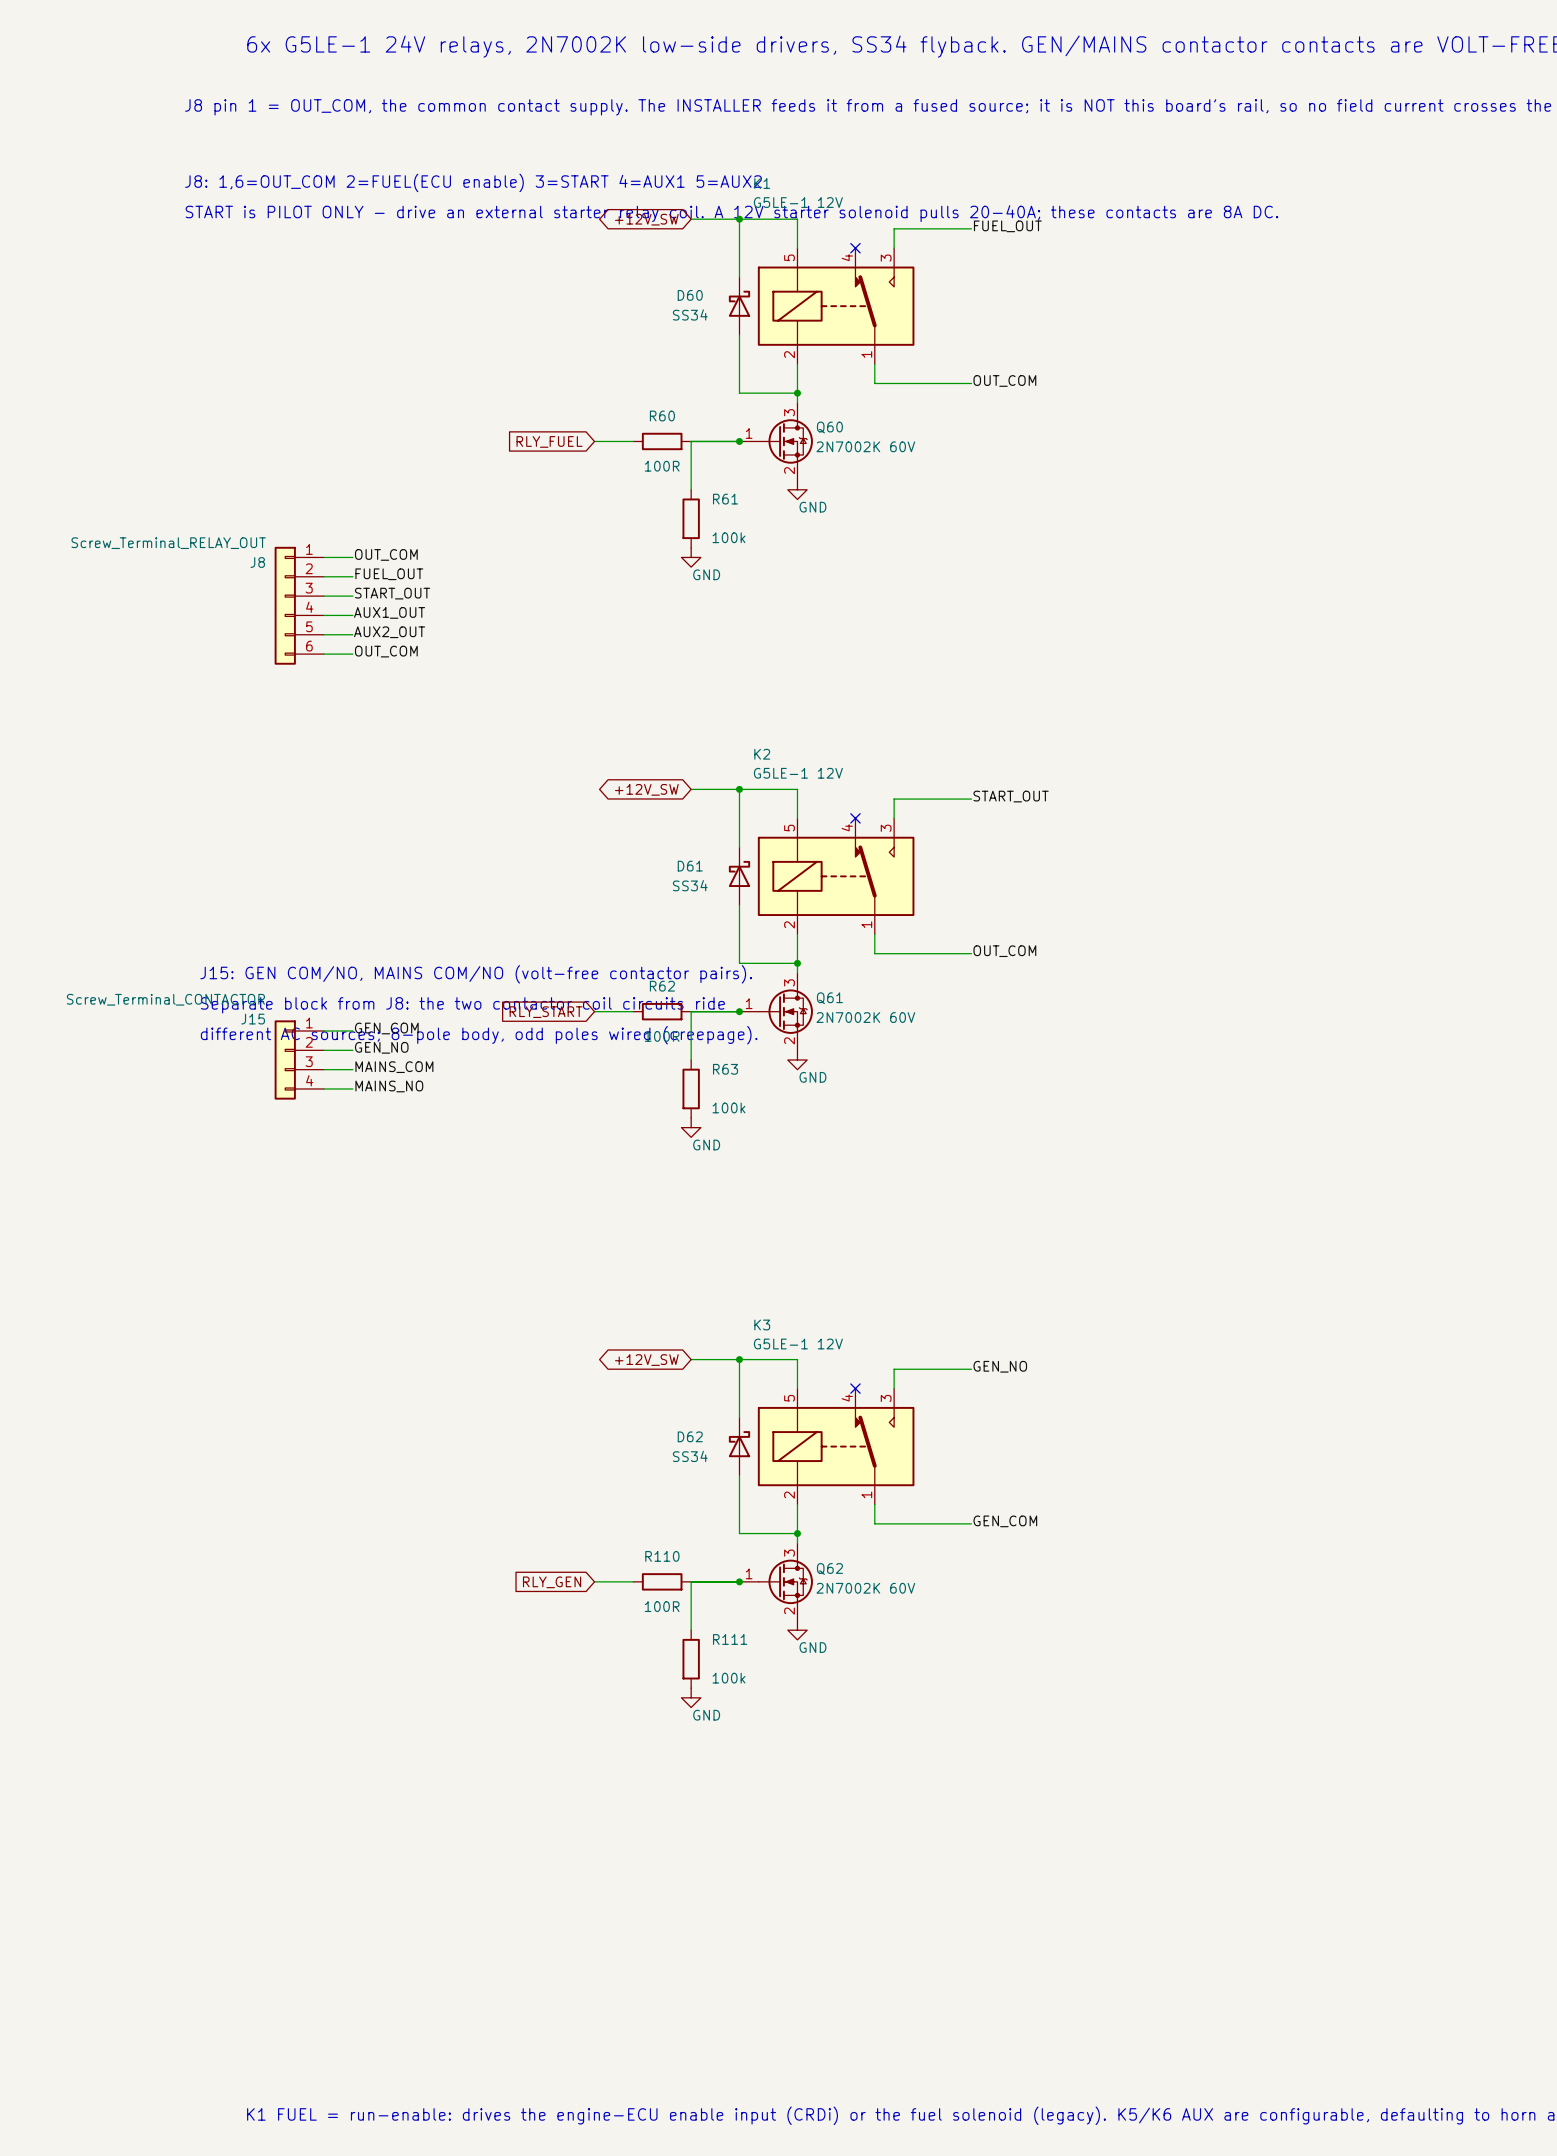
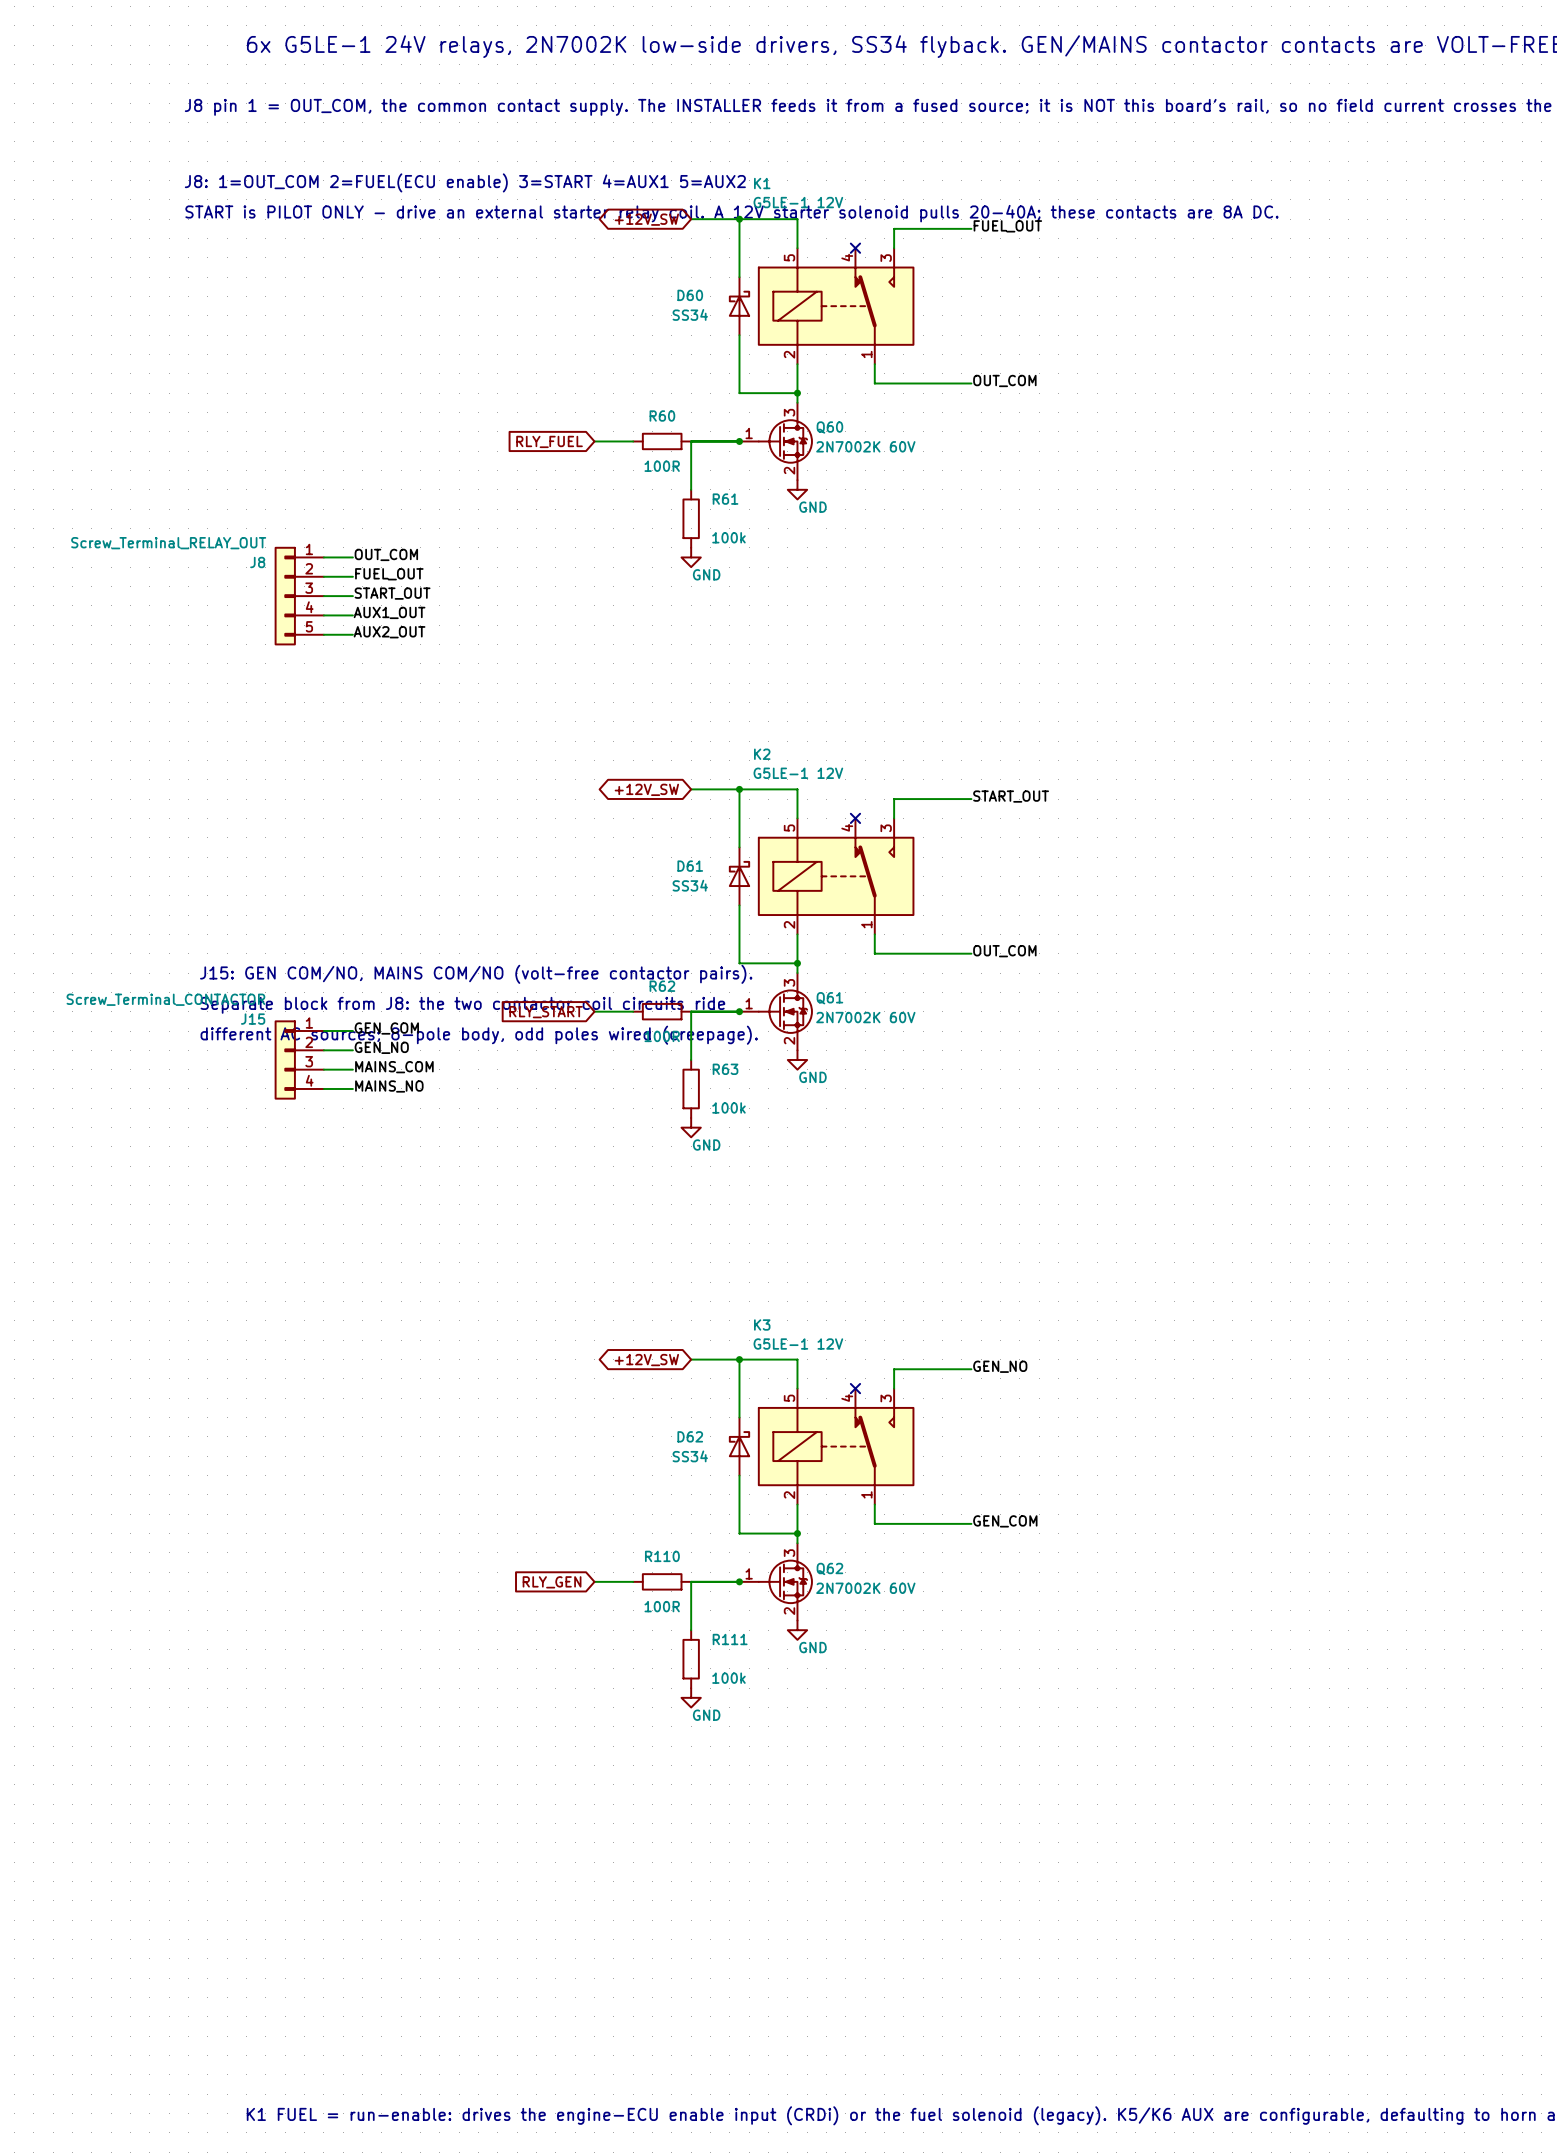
text: J8: 1,6=OUT_COM 2=FUEL(ECU enable) 3=START 4=AUX1 5=AUX2 (473, 182) -> J8: 1=OUT_COM 2=FUEL(ECU enable) 3=START 4=AUX1 5=AUX2 (465, 182)
J8 symbol: [274, 546, 324, 665] -> [274, 546, 324, 646]
label: OUT_COM (386, 651) -> none
wire: (323, 654) (352, 654) -> none

